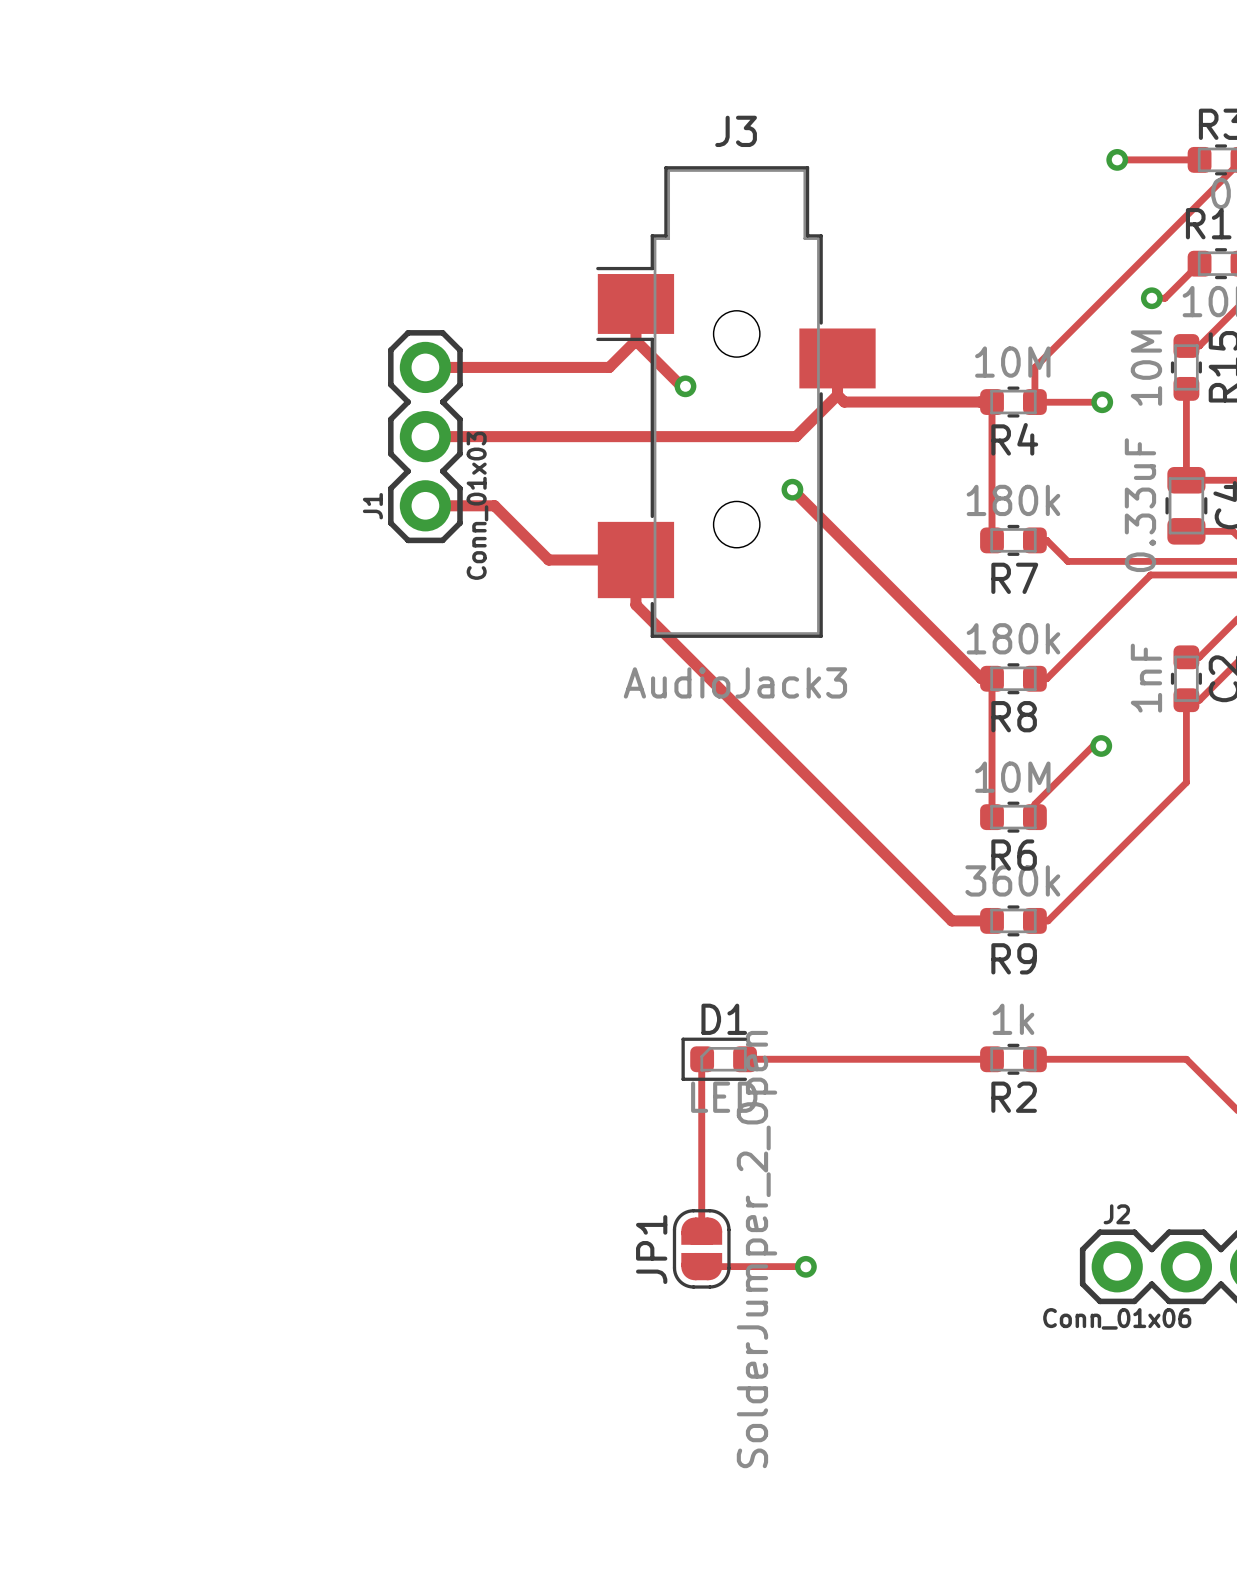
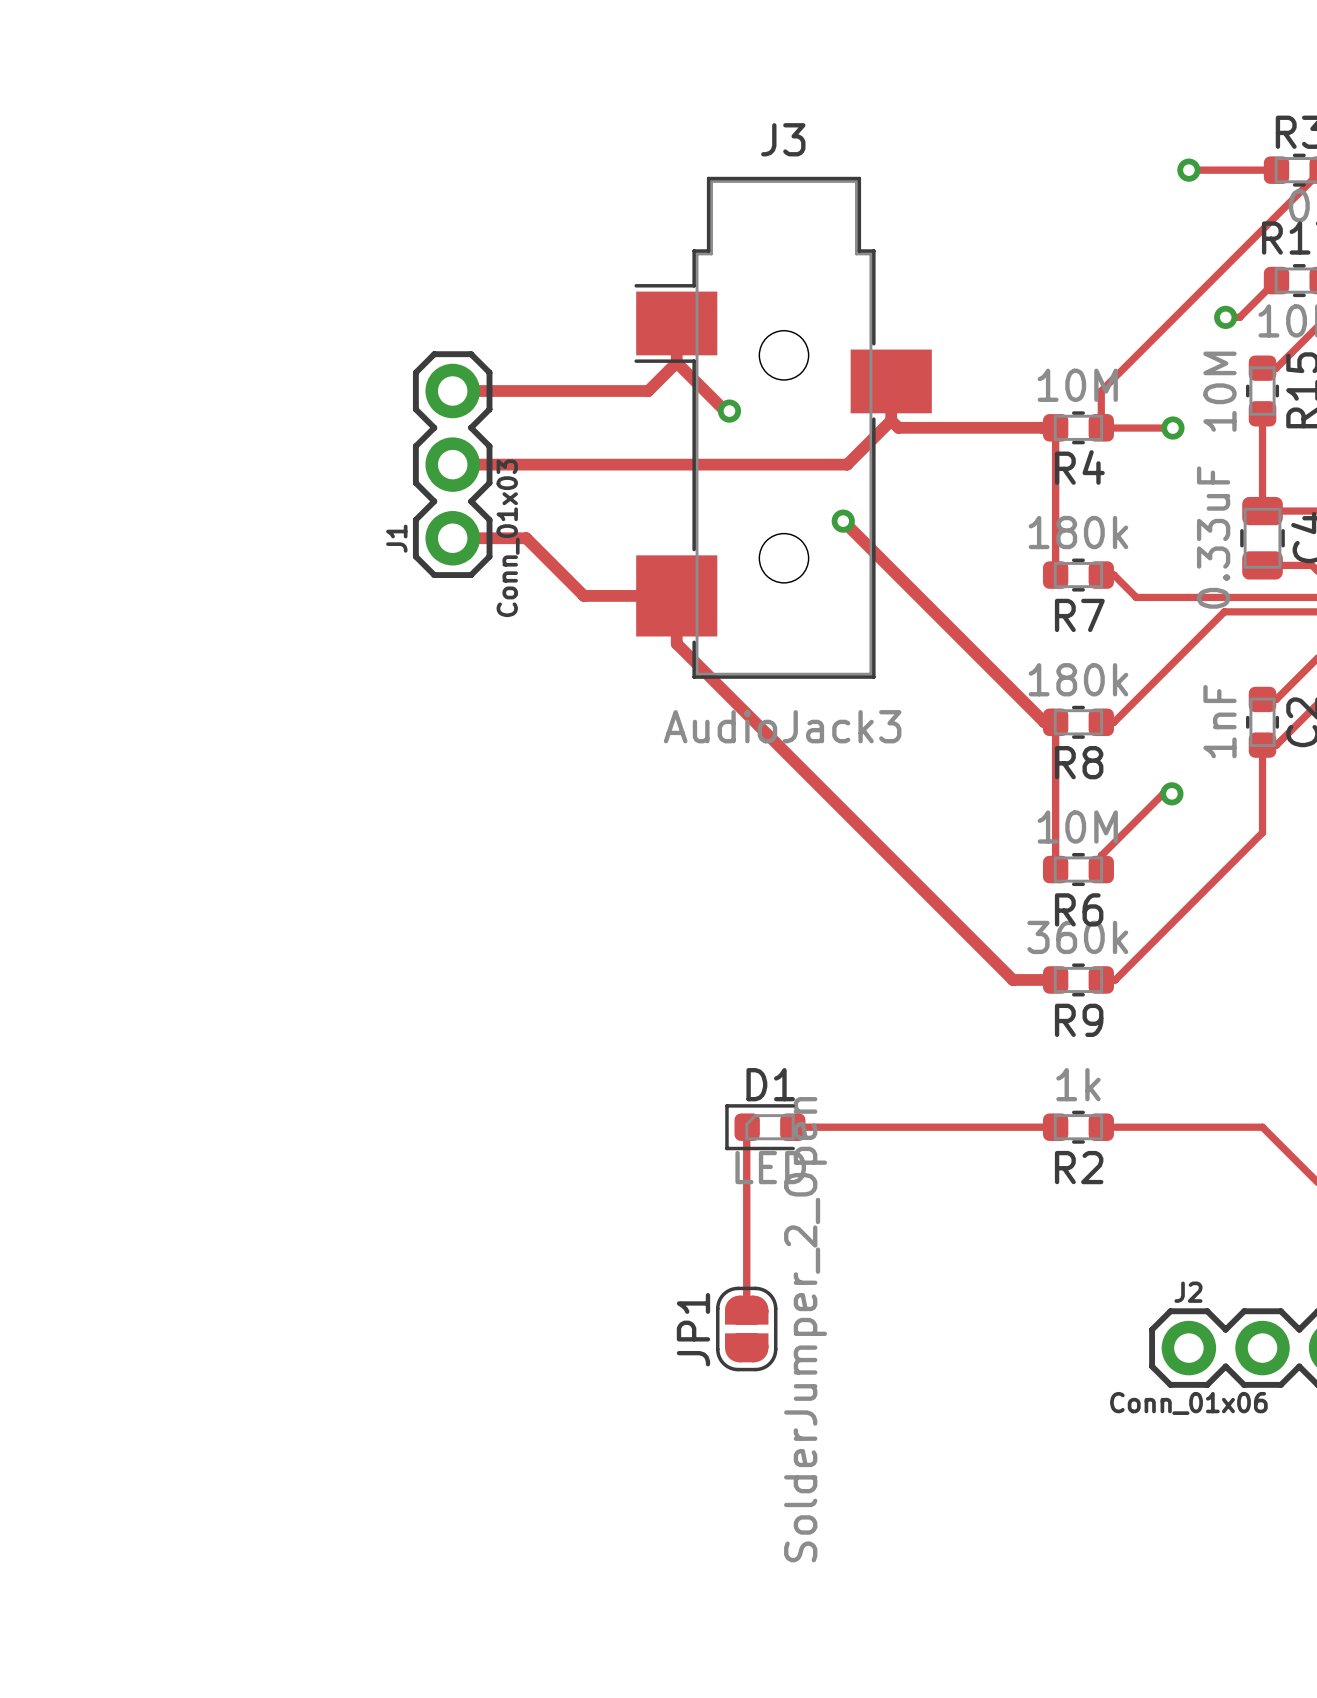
track: (701, 1266) (805, 1266) -> none
via: (805, 1266) -> none

